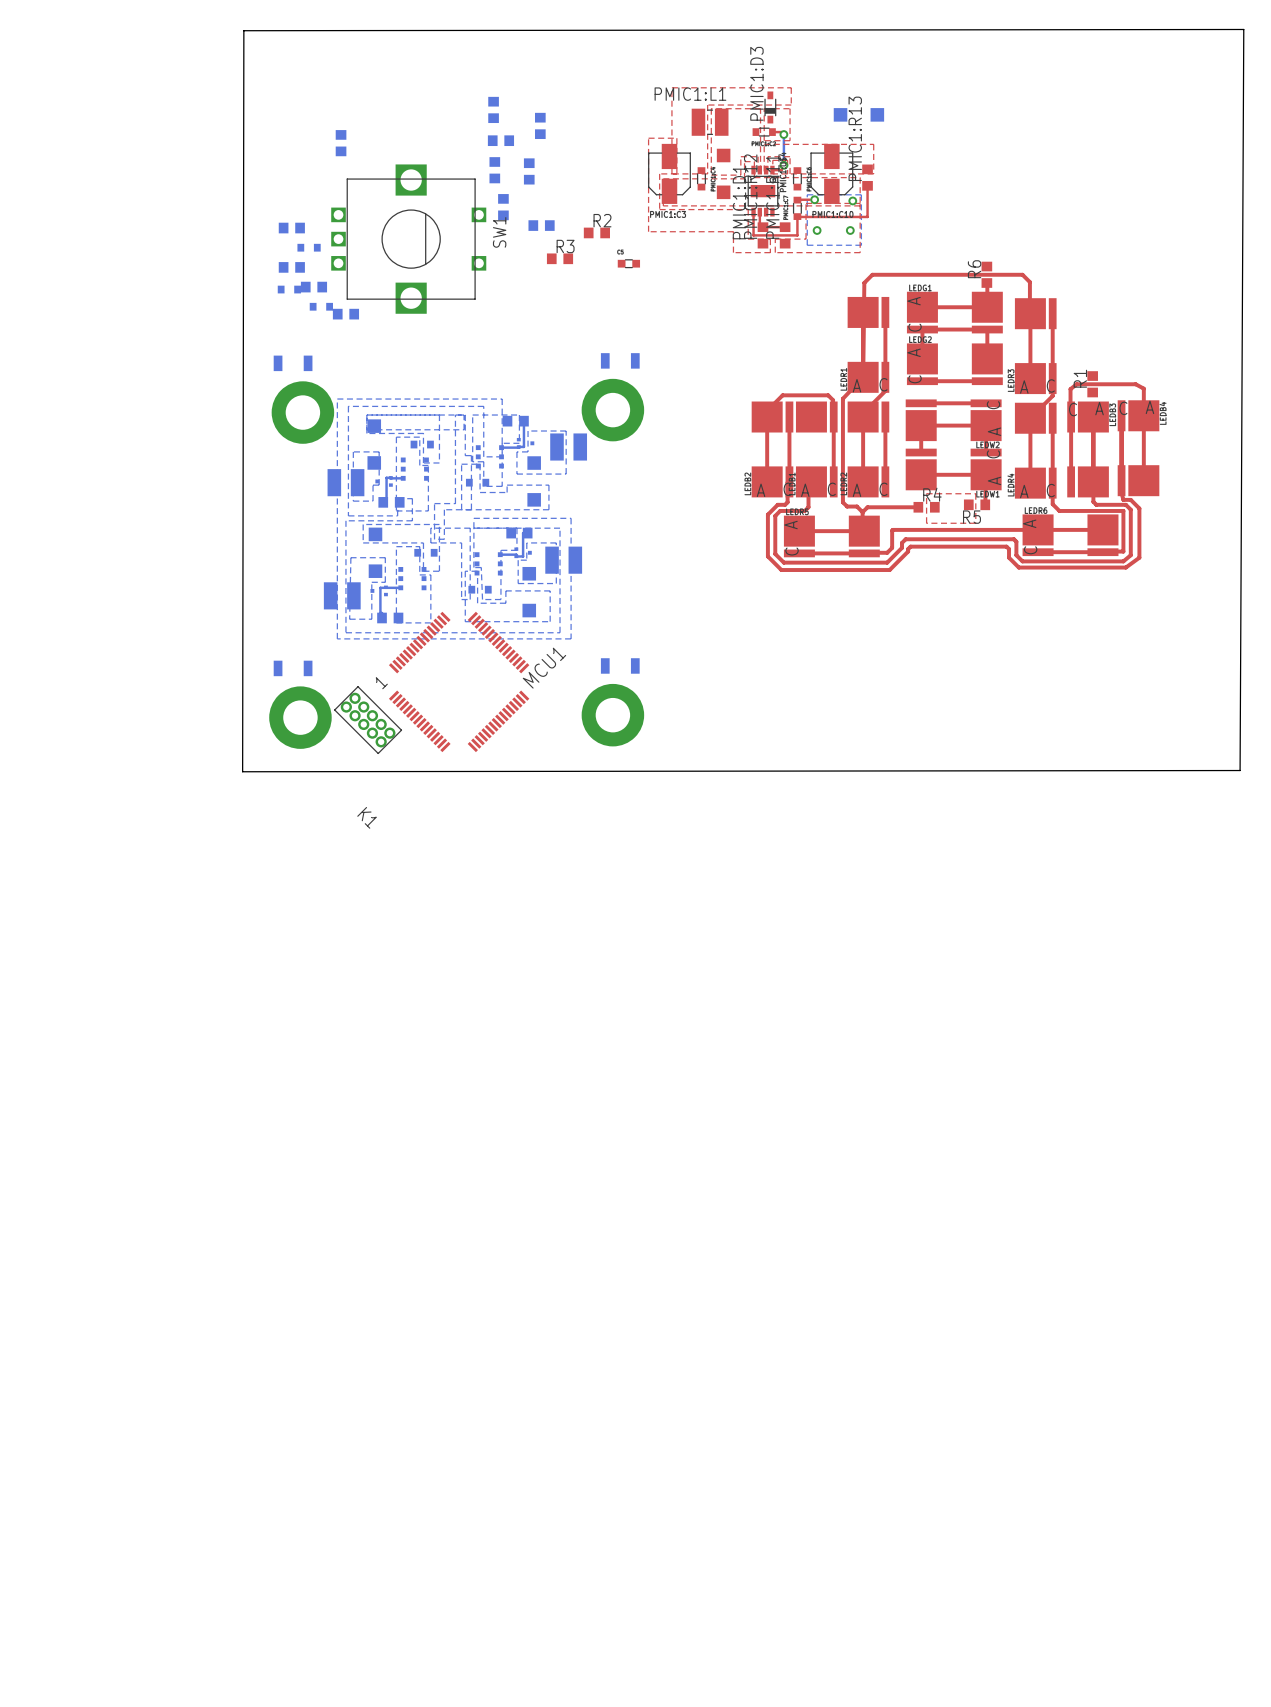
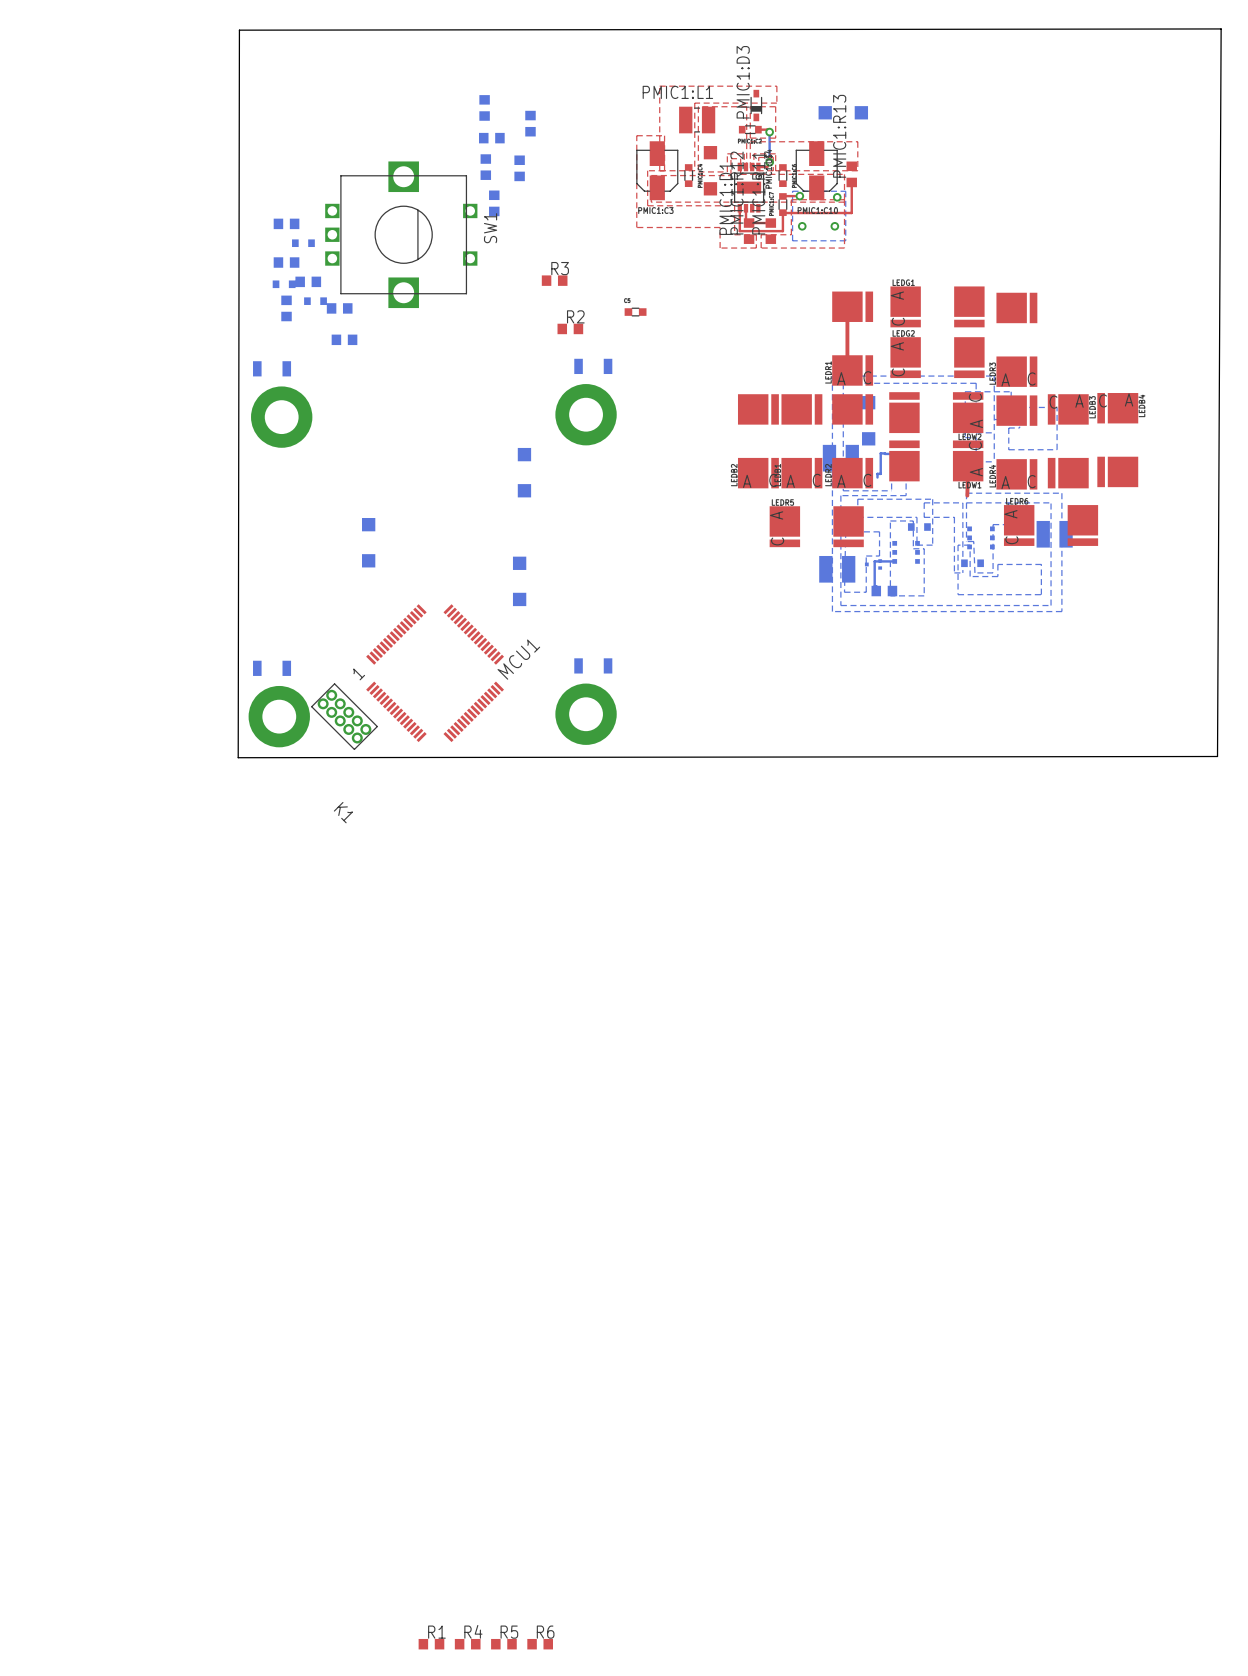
part: (341, 143) -> none
part: (541, 225) -> none
R2 position: (596, 232) -> (570, 328)
R3 position: (560, 258) -> (554, 280)
part position: (628, 263) -> (635, 312)
R6 rotation: 0° (986, 274) -> 90° clockwise (540, 1644)
R6 position: (986, 274) -> (540, 1644)
top track: (986, 283) (987, 307) (922, 307) -> none
top track: (885, 312) (885, 391) (866, 410) (866, 413) (863, 417) (863, 481) -> none
top track: (1052, 313) (1052, 395) (1030, 418) (1030, 483) -> none
part: none -> (286, 308)
part: none -> (344, 339)
top track: (922, 358) (922, 329) (987, 329) (987, 358) -> none
part position: (620, 360) -> (593, 366)
part position: (293, 363) -> (272, 368)
top track: (1030, 378) (1029, 282) (1022, 274) (872, 274) (864, 282) (863, 377) (842, 398) (842, 502) (847, 506) (856, 506) (862, 512) -> none
top track: (922, 381) (987, 381) -> none
R1 rotation: 0° (1092, 384) -> 90° clockwise (431, 1644)
R1 position: (1092, 384) -> (431, 1644)
top track: (921, 403) (986, 403) -> none
part position: (612, 410) -> (586, 414)
part position: (302, 412) -> (281, 417)
bottom zone outline: (439, 415) (439, 462) (423, 462) (423, 433) (366, 433) (366, 415) (465, 415) (465, 455) (471, 455) (471, 509) -> none
bottom zone outline: (455, 415) (455, 503) (434, 503) (434, 539) (444, 539) (444, 509) (548, 509) (548, 485) (507, 485) (507, 492) (480, 492) (480, 464) (461, 464) (461, 509) -> none
bottom zone outline: (464, 415) (464, 429) (366, 429) -> none
bottom zone outline: none -> (1019, 407) (1057, 407) (1057, 449) (1008, 449) (1008, 427) (1019, 427) (1019, 407)
top track: (1121, 415) (1121, 493) (1123, 499) (1130, 499) (1139, 508) (1139, 557) (1125, 567) (1018, 567) (1009, 557) (1009, 549) (1006, 546) (910, 546) (889, 570) (781, 570) (767, 556) (767, 514) (777, 504) (785, 504) (787, 502) (789, 417) -> none
top track: (885, 417) (885, 481) -> none
top track: (1093, 417) (1093, 501) (1096, 504) (1125, 504) (1130, 509) (1130, 555) (1123, 561) (1022, 561) (1016, 555) (1016, 541) (1013, 539) (905, 539) (901, 542) (901, 547) (887, 562) (783, 562) (775, 554) (775, 515) (780, 510) (804, 510) (808, 507) (808, 484) (811, 481) -> none
top track: (1052, 418) (1052, 504) (1059, 510) (1123, 510) (1123, 551) (1100, 552) -> none
part: (515, 421) -> none
bottom track: (523, 421) (523, 446) (501, 447) -> none
bottom zone outline: none -> (994, 419) (1011, 419) (1011, 391) (965, 391) (965, 437) (976, 437) (976, 461) (994, 461) (994, 376) (832, 376) (832, 611) (1061, 611) (1061, 493) (966, 493) (966, 541) (973, 541) (974, 572) (993, 572) (993, 524) (1008, 524) (1008, 502)
part: none -> (868, 420)
bottom zone outline: (528, 431) (566, 431) (566, 474) (516, 474) (516, 451) (528, 451) (528, 431) -> none
bottom zone outline: (396, 437) (396, 510) (428, 510) (428, 465) (419, 465) (419, 437) (396, 437) -> none
bottom zone outline: none -> (994, 432) (976, 432) (976, 383) (843, 383) (843, 490) (891, 490) (891, 473) (906, 473) (906, 495) (840, 495) (840, 605) (1051, 605) (1051, 502) (966, 502)
bottom zone outline: (502, 443) (519, 443) (519, 415) (472, 415) (472, 461) (483, 461) (483, 486) (502, 486) (502, 399) (337, 399) (337, 638) (571, 638) (571, 518) (473, 518) (473, 567) (481, 567) (482, 599) (500, 599) (500, 550) (516, 550) (516, 528) -> none
part: (525, 443) -> none
part: (374, 444) -> none
part: (422, 444) -> none
part: (568, 447) -> none
bottom zone outline: (353, 451) (379, 451) (379, 485) (373, 485) (373, 501) (353, 501) (353, 451) -> none
top track: (921, 452) (921, 425) (986, 425) (986, 452) -> none
part: (489, 456) -> none
bottom zone outline: (502, 456) (483, 456) (483, 406) (348, 406) (348, 515) (397, 515) (397, 498) (412, 498) (412, 520) (345, 520) (345, 632) (560, 632) (560, 528) (473, 528) -> none
bottom track: none -> (897, 453) (880, 453) (880, 473) (877, 473) (877, 477)
part: none -> (840, 458)
part: (414, 469) -> none
top track: (921, 474) (986, 474) -> none
bottom track: (403, 478) (386, 477) (386, 498) (383, 498) (383, 502) -> none
top track: (1143, 480) (1143, 388) (1135, 384) (1076, 384) (1070, 389) (1071, 481) -> none
part: (384, 481) -> none
top track: (767, 481) (767, 417) (764, 413) (782, 395) (828, 395) (833, 400) (833, 481) -> none
part: (345, 482) -> none
part: (477, 482) -> none
top zone outline: (926, 493) (975, 493) (975, 523) (926, 523) (926, 493) -> none
part: (391, 502) -> none
R5 position: (977, 504) -> (503, 1644)
top track: (918, 507) (867, 507) (862, 512) -> none
R4 position: (926, 507) -> (467, 1644)
bottom zone outline: none -> (857, 499) (857, 517) (916, 517) (916, 545) (932, 545) (932, 499) (857, 499)
top track: (862, 512) (864, 531) (799, 531) -> none
bottom zone outline: none -> (924, 502) (924, 517) (954, 517) (954, 572) (962, 572) (962, 502) (924, 502)
R5 name position: R5 (971, 517) -> R5 (509, 1632)
bottom zone outline: (363, 524) (439, 524) (439, 571) (423, 571) (423, 542) (363, 542) (363, 524) -> none
bottom zone outline: (430, 528) (470, 528) (470, 599) (461, 599) (461, 542) (430, 542) (430, 528) -> none
top track: (1102, 529) (892, 529) (892, 547) (887, 552) (799, 553) -> none
bottom zone outline: none -> (890, 520) (890, 595) (924, 595) (924, 548) (913, 548) (913, 520) (890, 520)
part: (519, 533) -> none
bottom track: (527, 533) (523, 533) (523, 556) (500, 554) -> none
part: none -> (919, 527)
bottom zone outline: none -> (845, 531) (879, 531) (879, 556) (866, 556) (866, 592) (844, 592) (845, 531)
bottom zone outline: (526, 542) (556, 542) (556, 583) (518, 583) (518, 560) (526, 560) (526, 542) -> none
part: none -> (1054, 534)
bottom zone outline: (396, 546) (396, 622) (430, 622) (430, 574) (419, 574) (419, 546) (396, 546) -> none
part: none -> (980, 537)
part: (425, 552) -> none
part: (523, 552) -> none
top track: (1038, 552) (1102, 552) -> none
bottom zone outline: none -> (958, 545) (970, 545) (970, 576) (997, 576) (997, 564) (1041, 564) (1041, 594) (958, 594) (958, 545)
bottom zone outline: (350, 557) (385, 557) (385, 582) (371, 582) (371, 619) (349, 619) (350, 557) -> none
part: (563, 560) -> none
part: none -> (906, 552)
part: (488, 563) -> none
bottom zone outline: (465, 571) (477, 571) (477, 603) (505, 603) (505, 590) (550, 590) (550, 621) (465, 621) (465, 571) -> none
bottom track: none -> (894, 561) (874, 561) (876, 591)
part: none -> (972, 563)
part: none -> (873, 564)
part: (412, 578) -> none
part: none -> (837, 569)
bottom track: (400, 587) (380, 587) (382, 617) -> none
part: (480, 589) -> none
part: (379, 590) -> none
part: (342, 595) -> none
part: none -> (884, 591)
part: (390, 617) -> none
part position: (620, 665) -> (593, 665)
part position: (293, 668) -> (272, 668)
MCU1 position: (459, 681) -> (435, 673)
part position: (612, 715) -> (586, 714)
part position: (300, 717) -> (279, 716)
K1 position: (368, 720) -> (344, 716)

